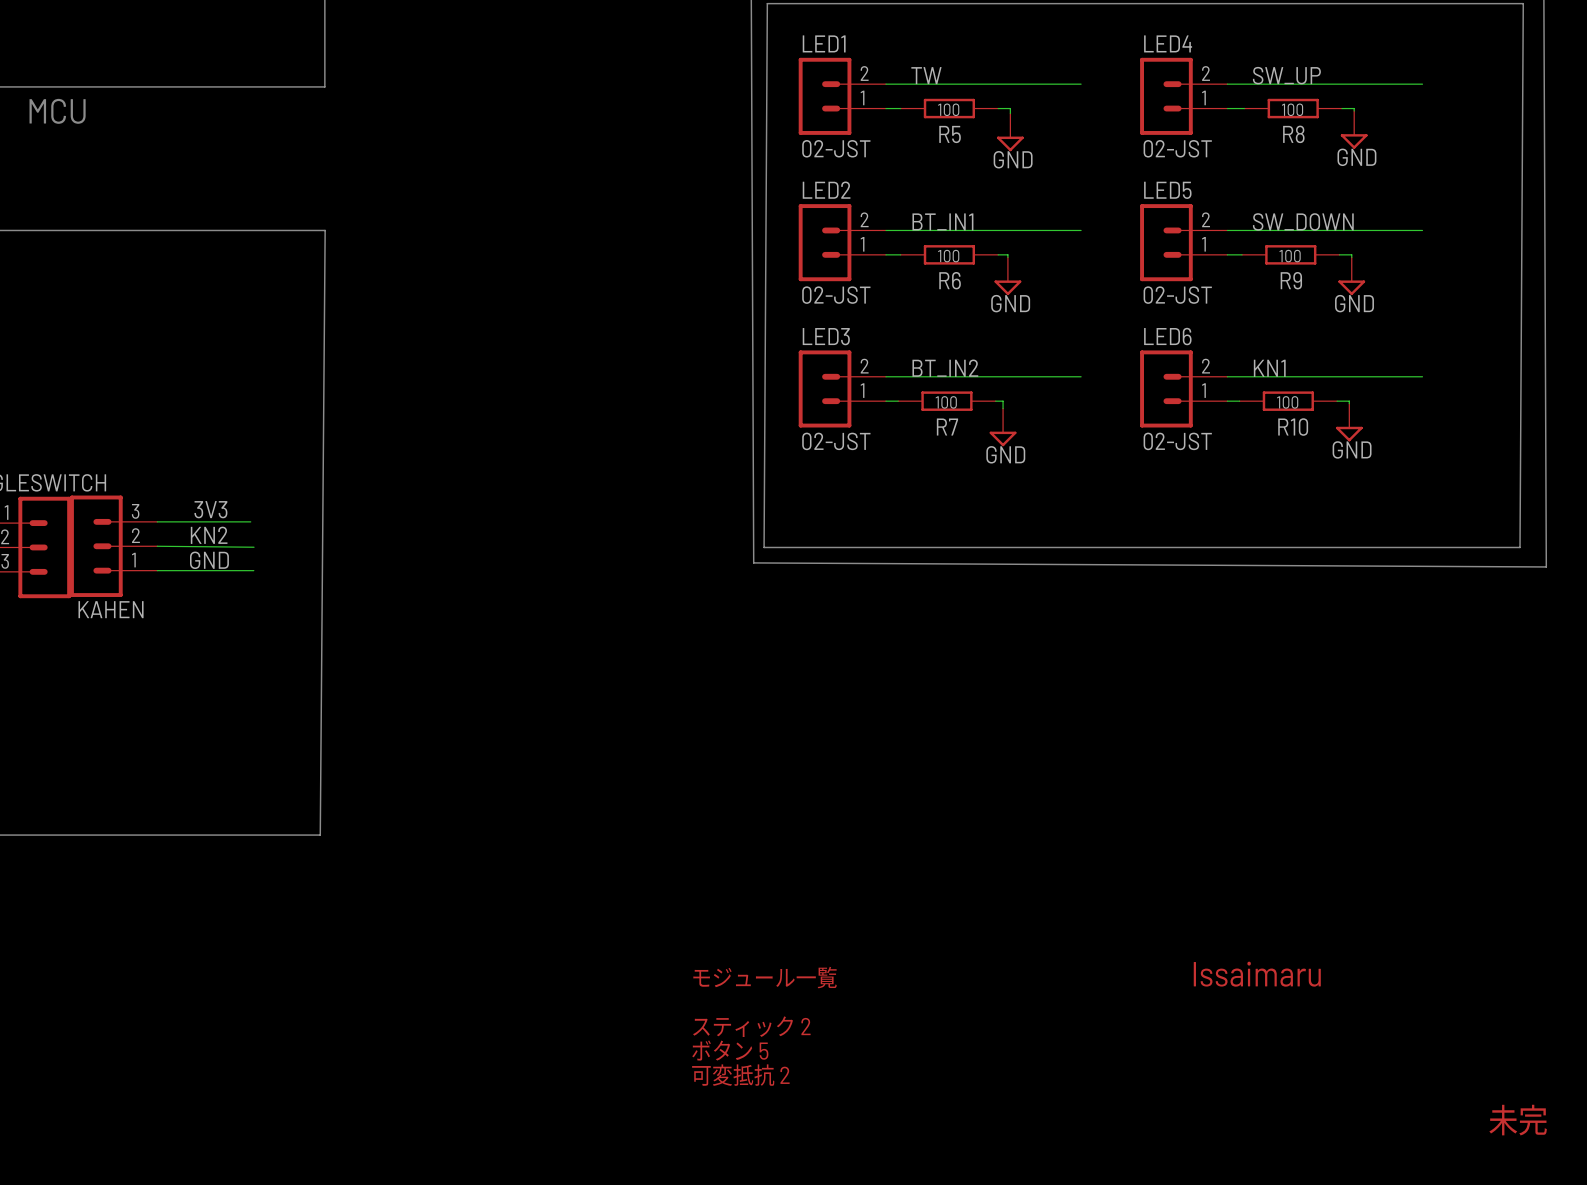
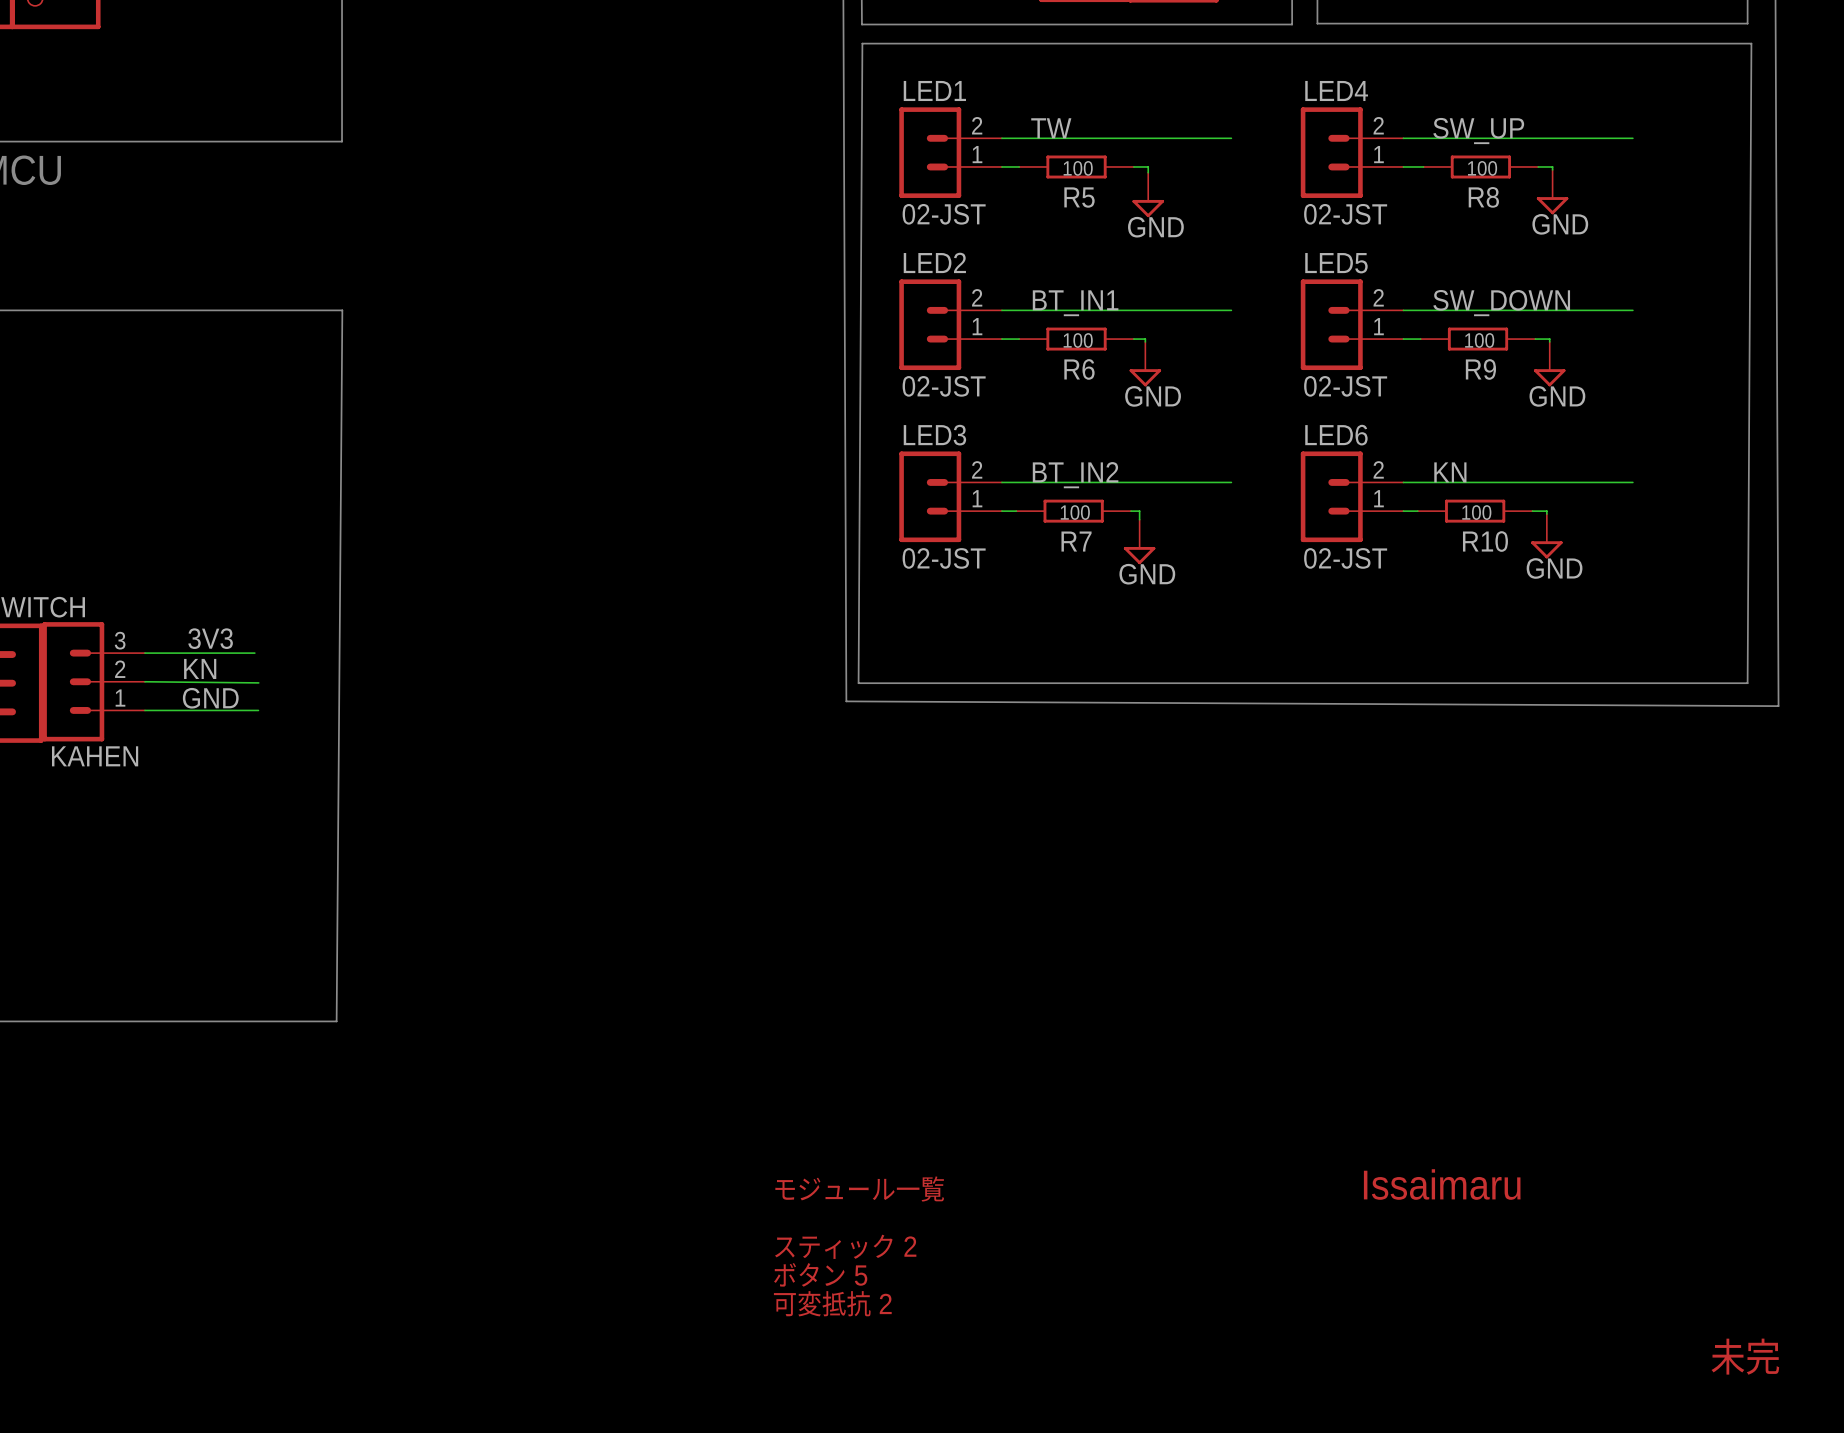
label: KN1 (1269, 368) -> KN (1450, 472)
label: KN2 (209, 535) -> KN (200, 668)

